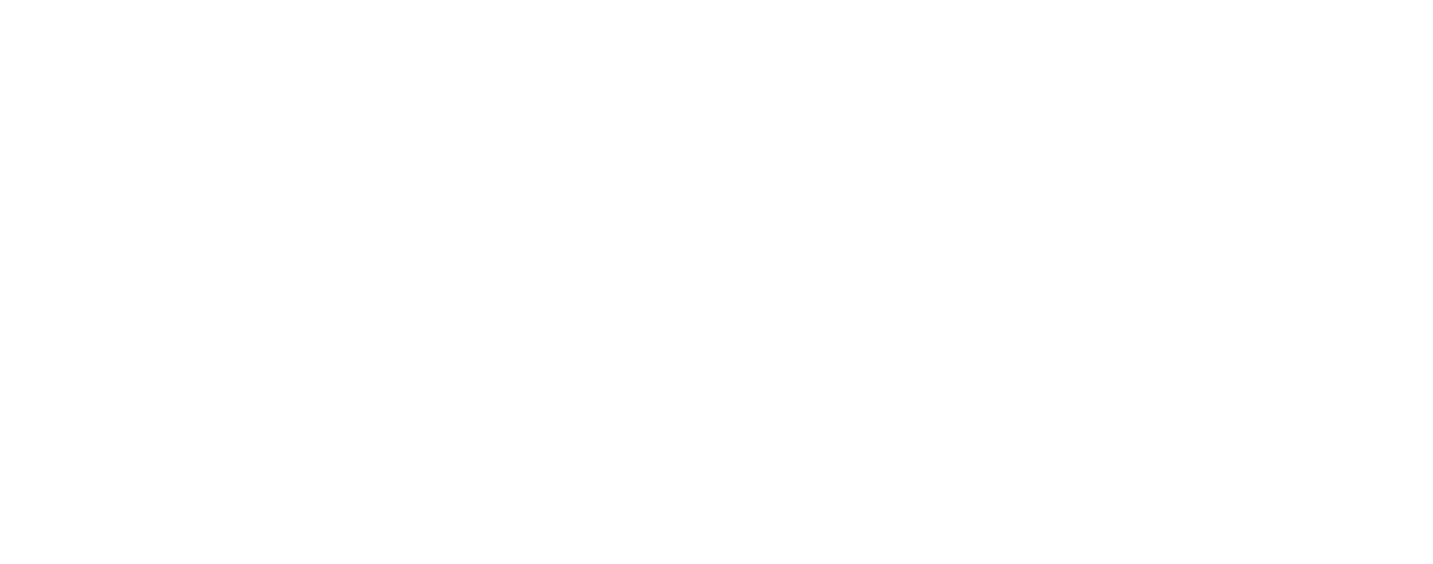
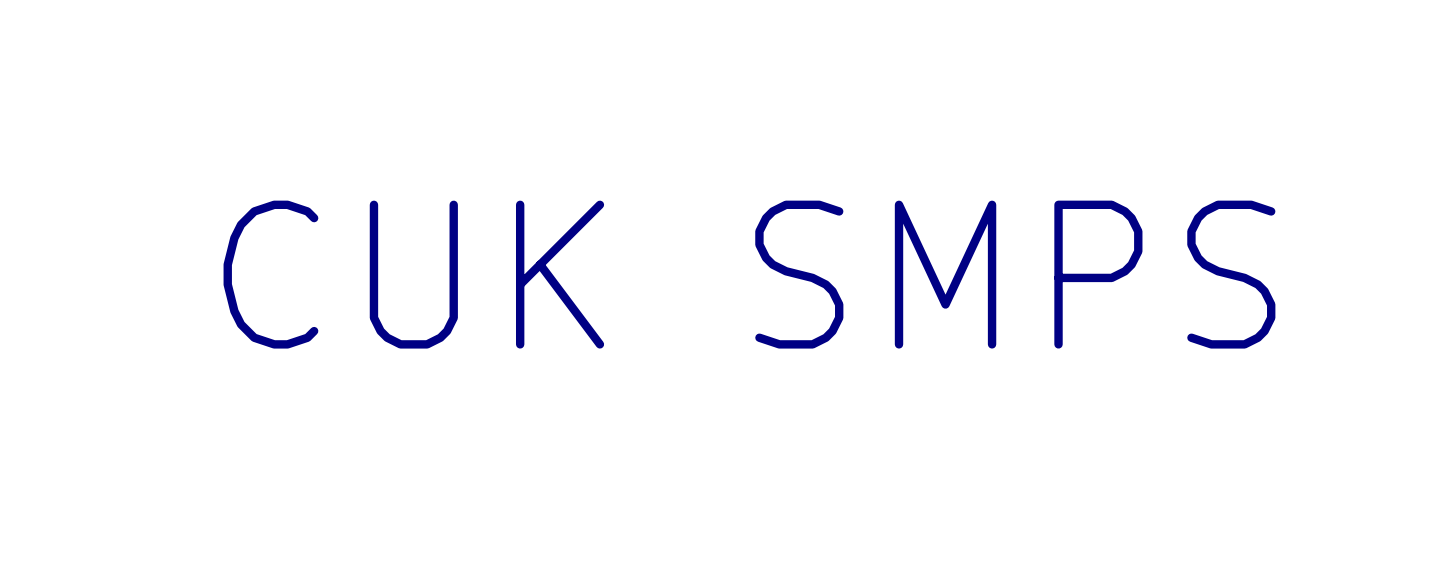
text: none -> CUK SMPS (749, 274)

